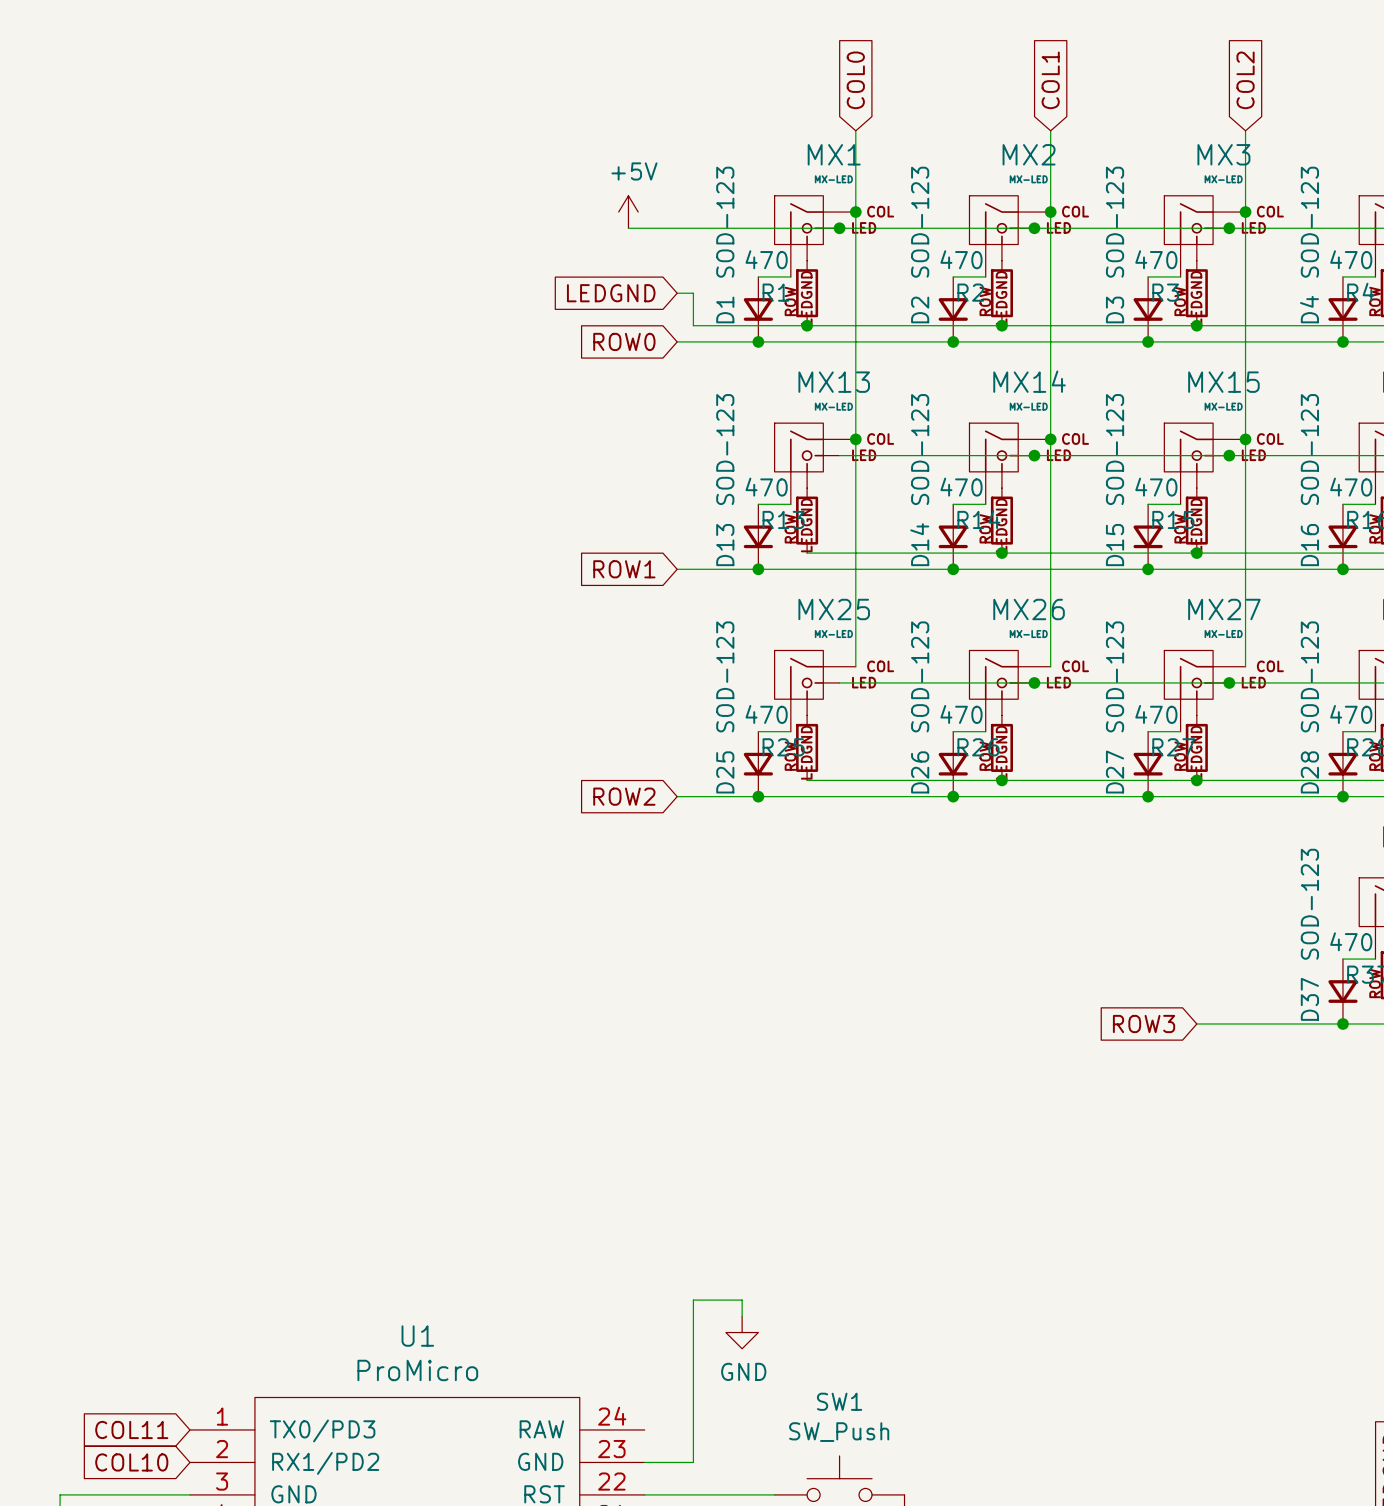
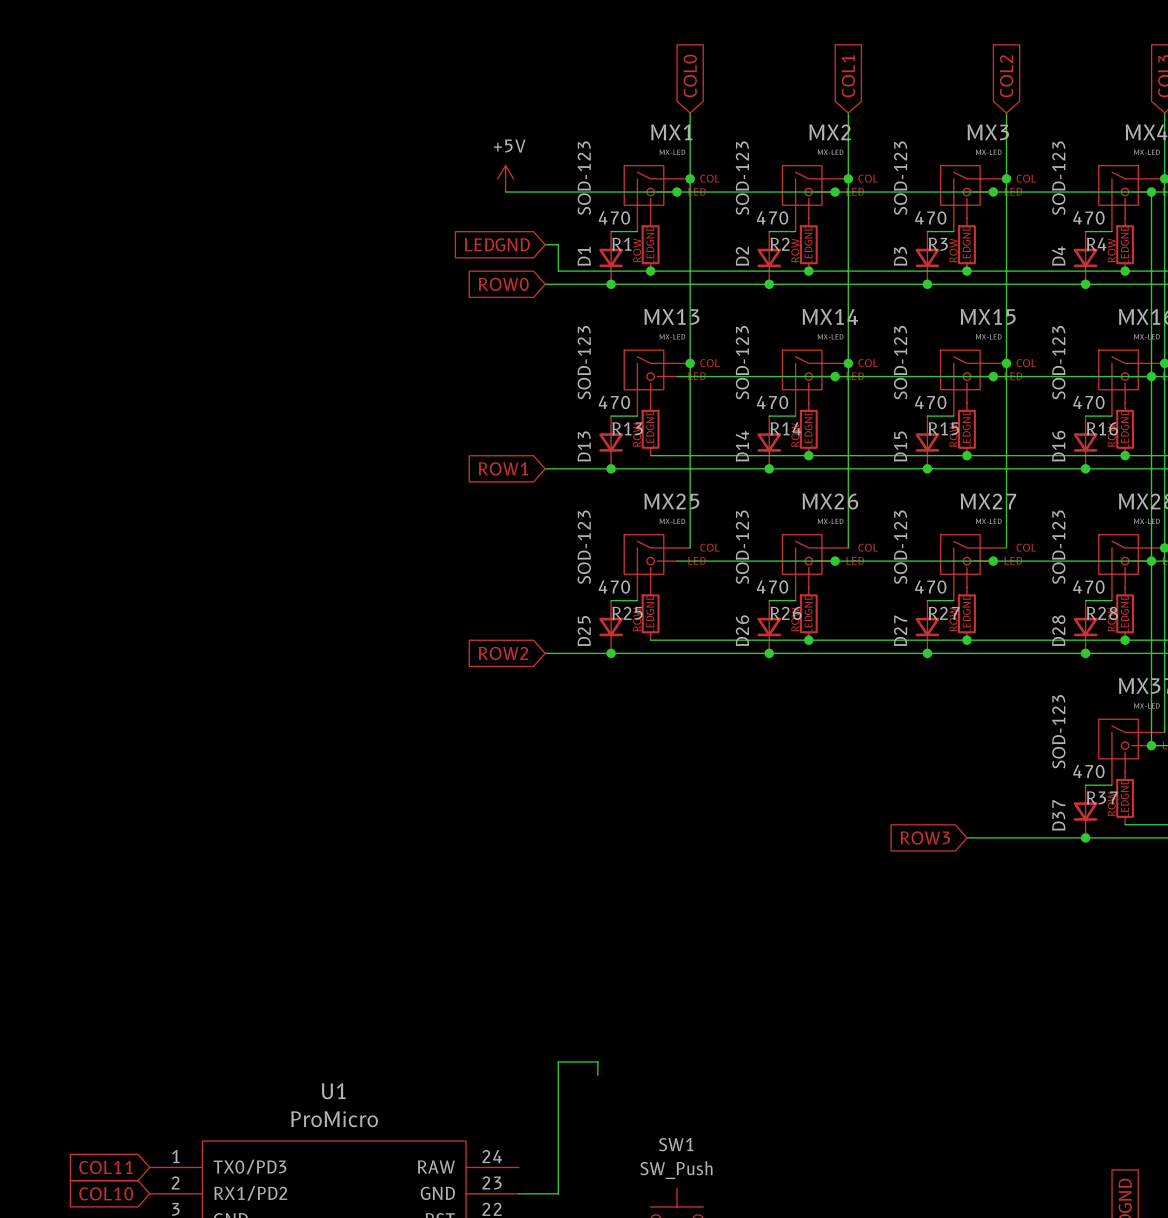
power symbol: GND (742, 1332) -> none

